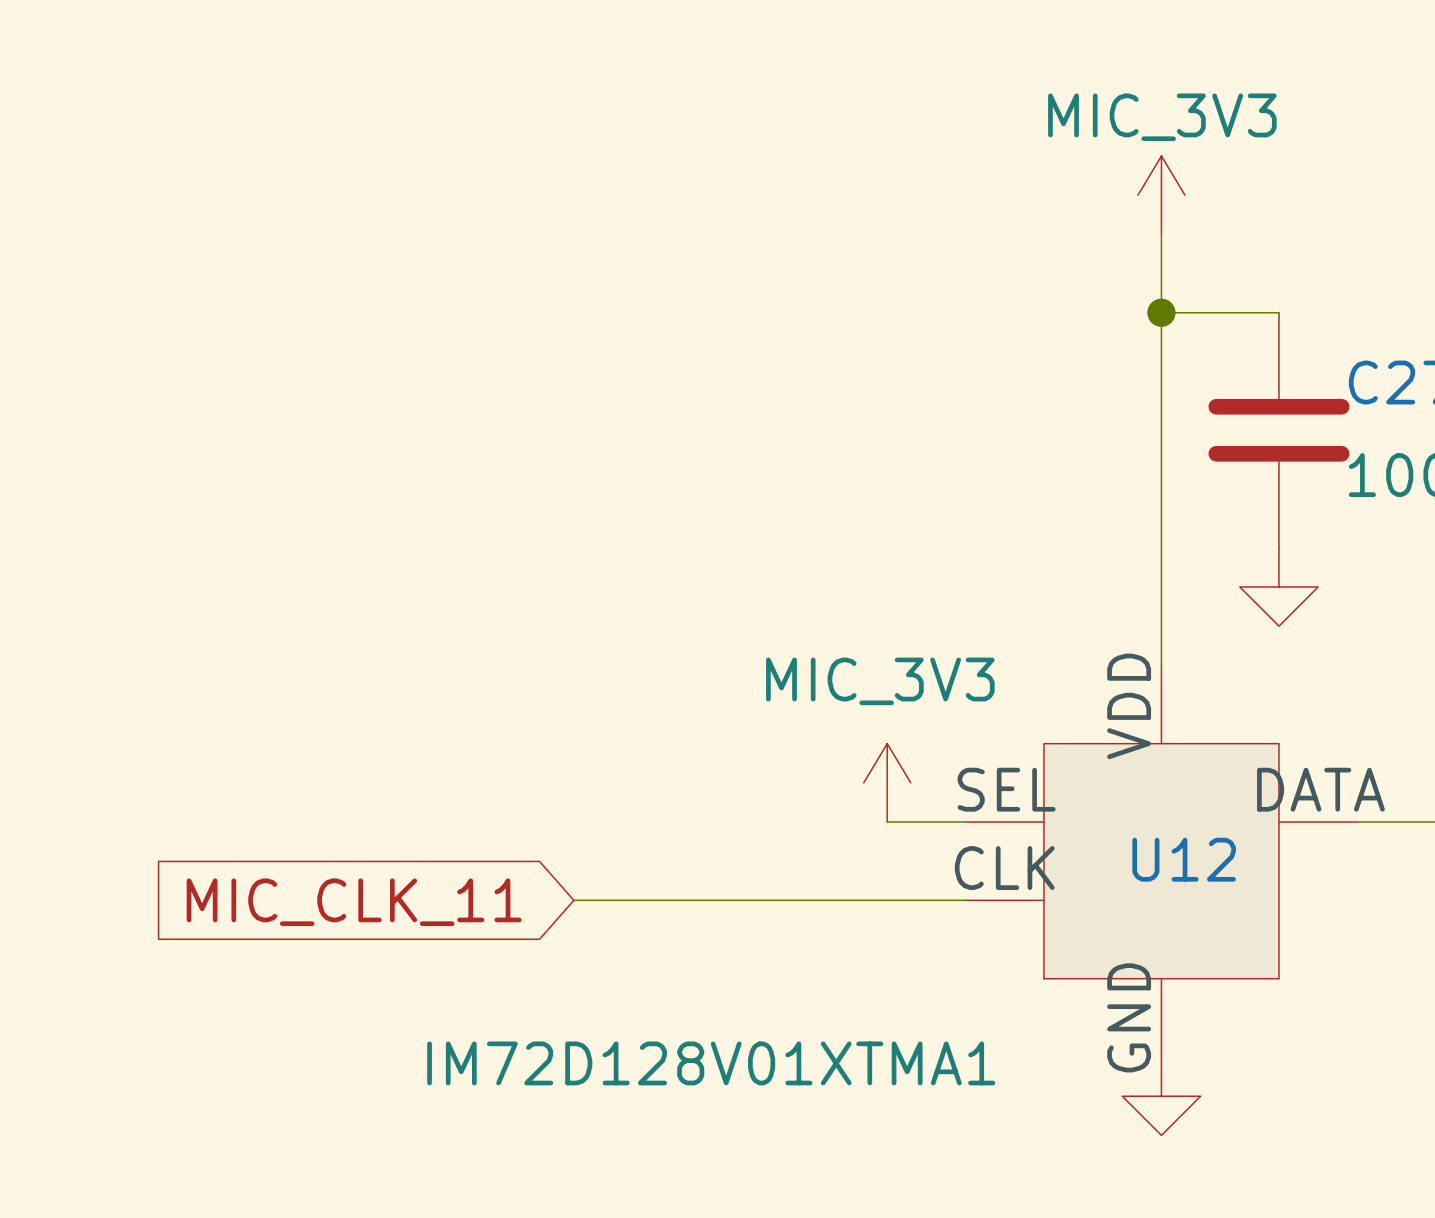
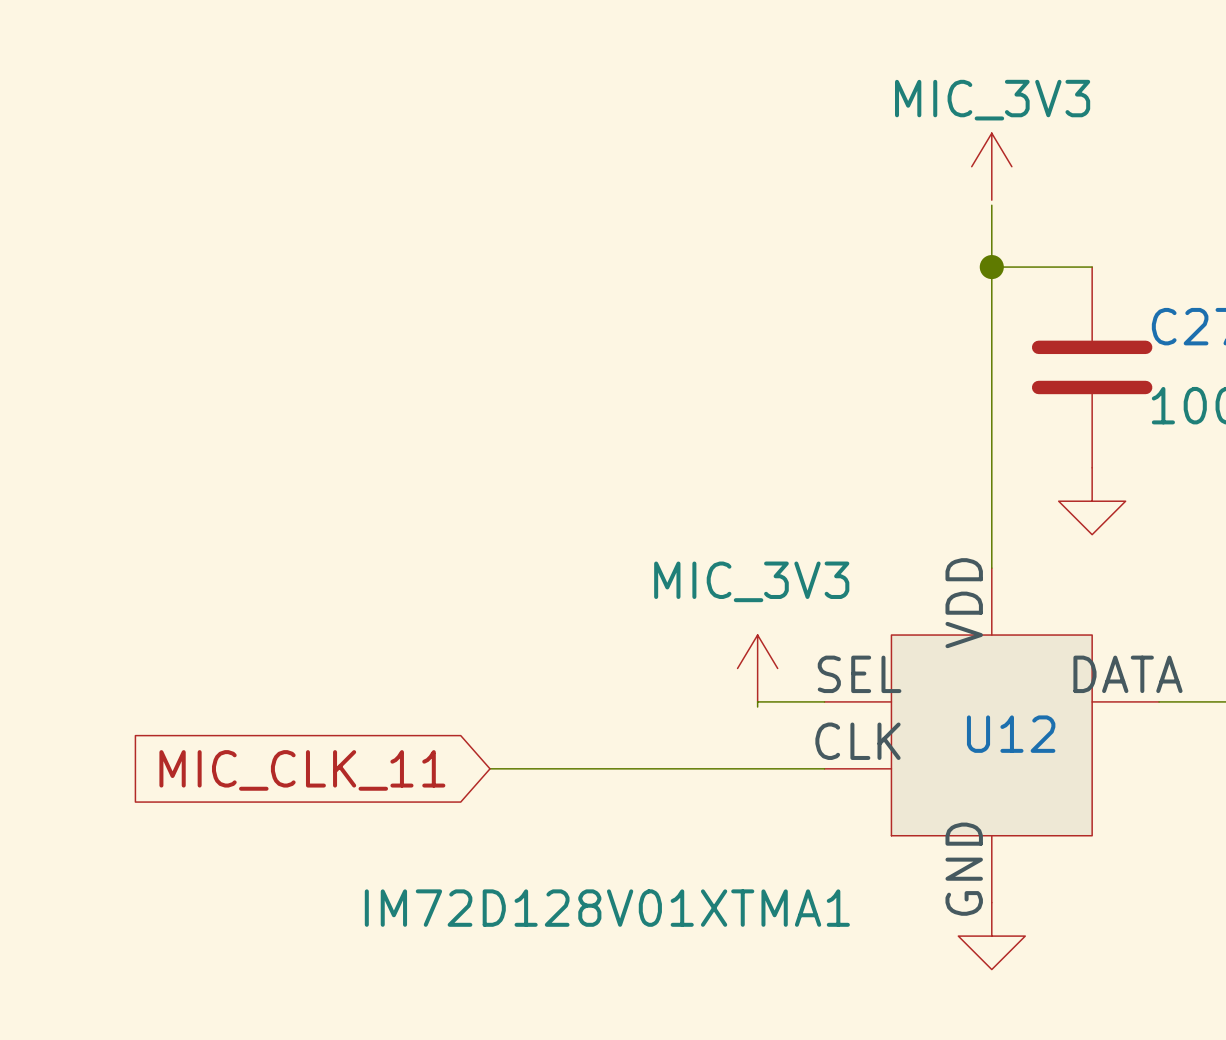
wire: (1161, 234) (1161, 240) -> (757, 701) (757, 707)

